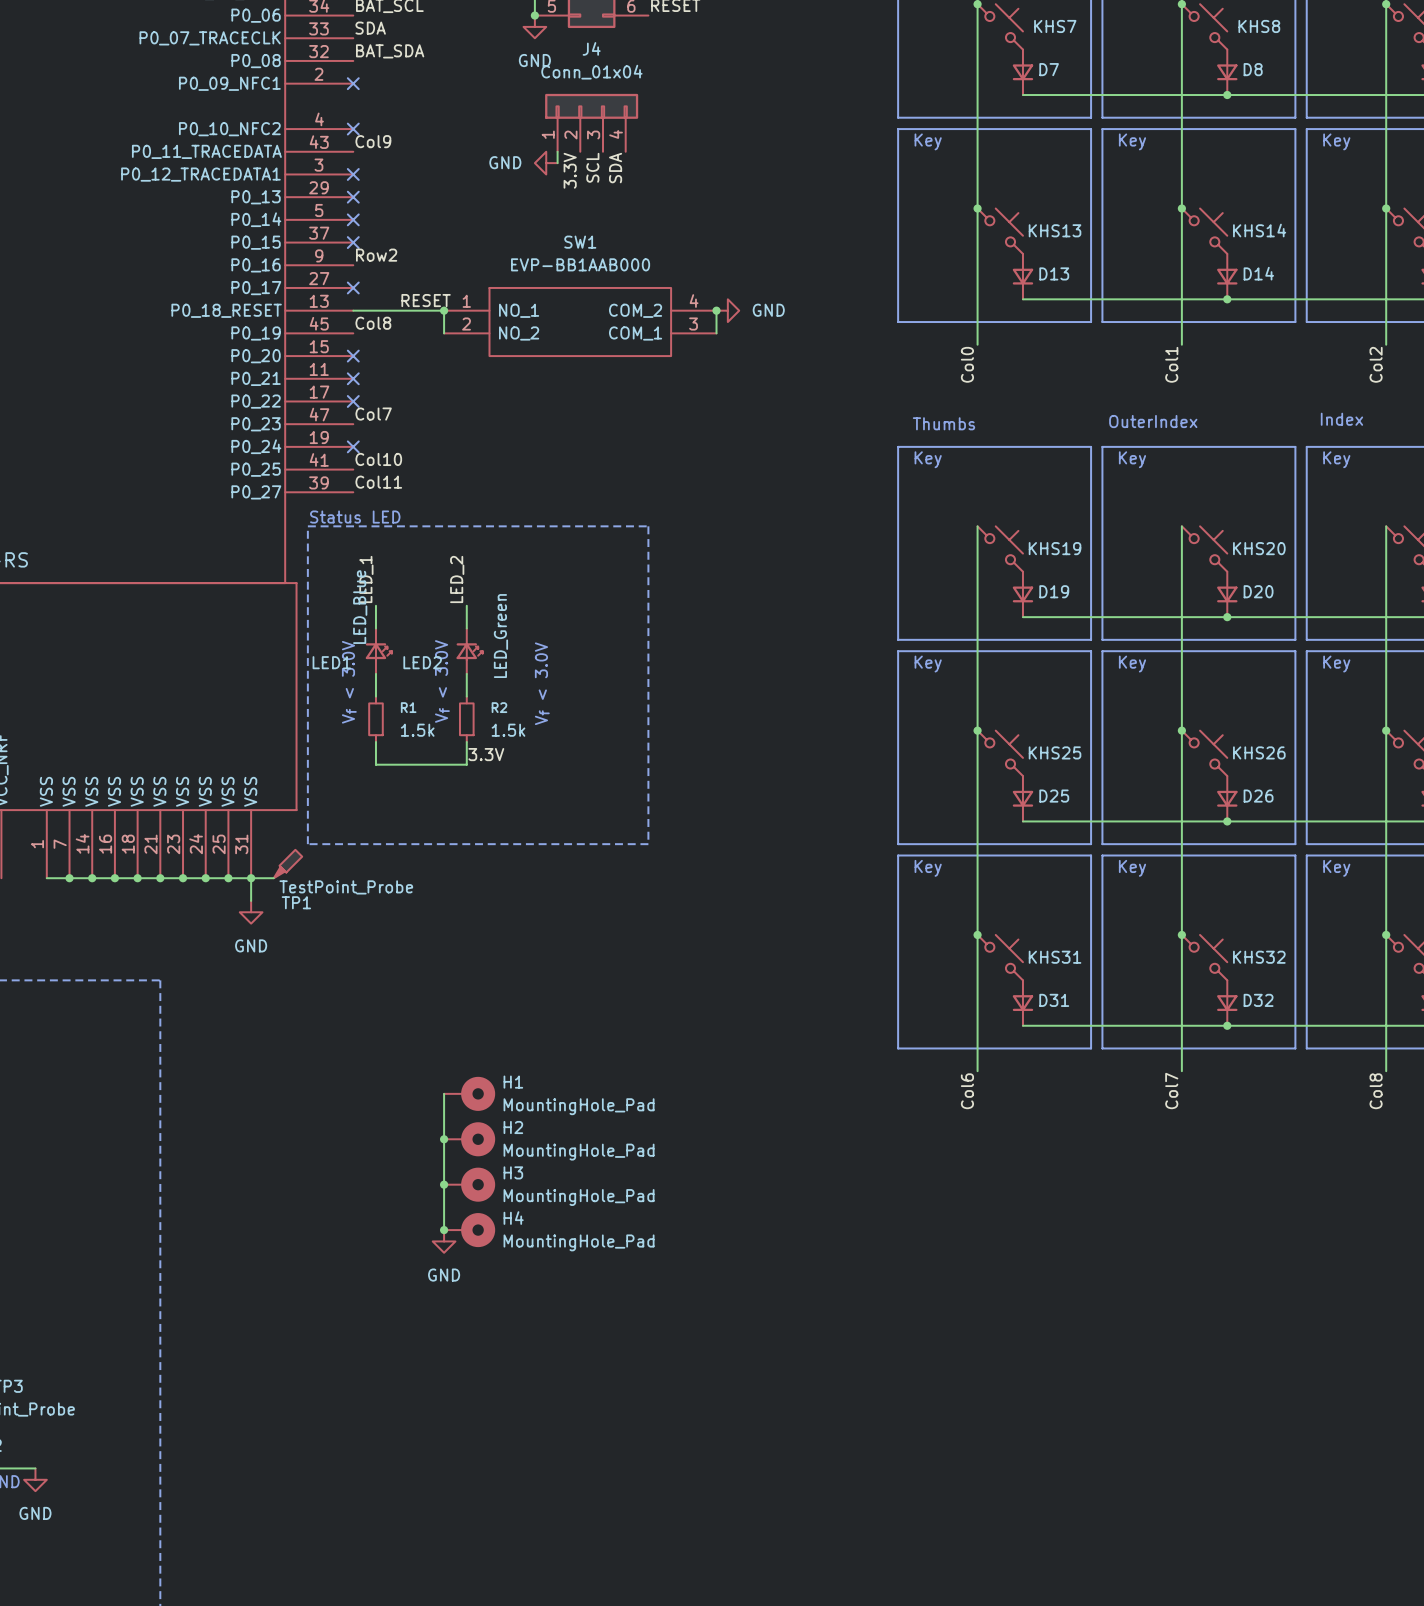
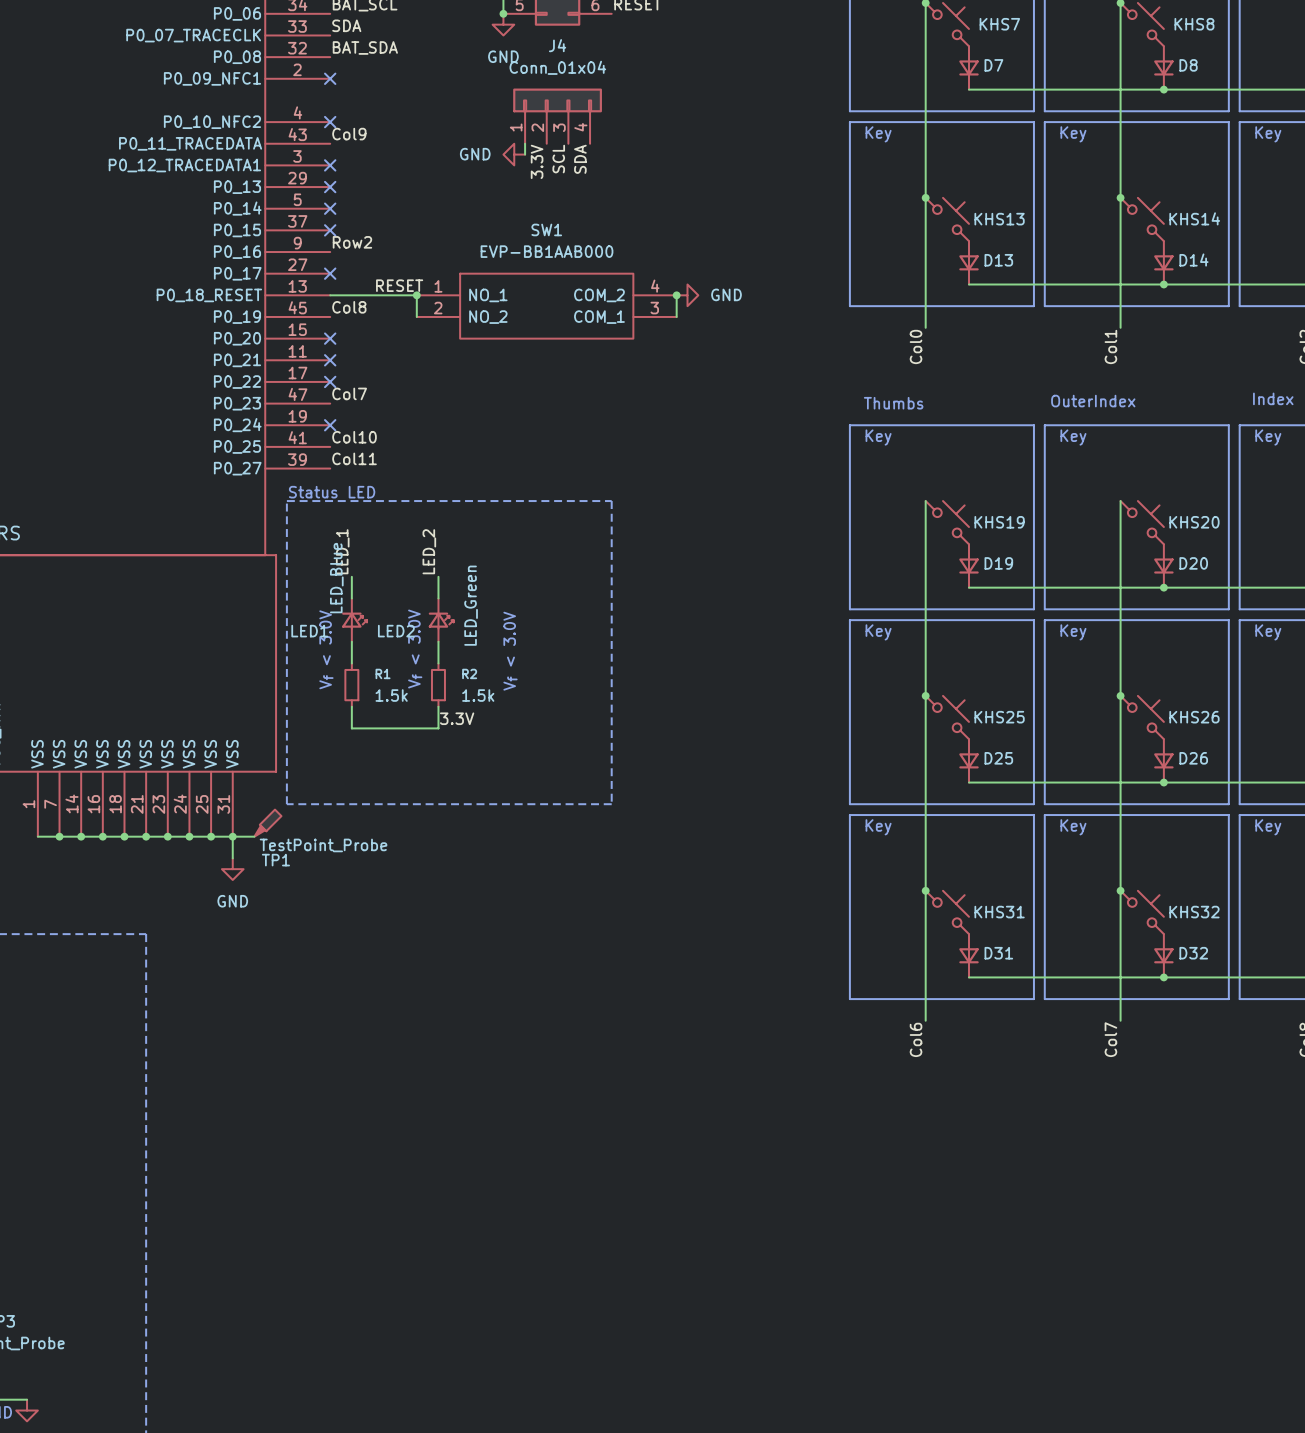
wire: (444, 1093) (444, 1230) -> none
H1: MountingHole_Pad (469, 1093) -> none
junction: (444, 1139) -> none
H2: MountingHole_Pad (469, 1139) -> none
junction: (444, 1184) -> none
H3: MountingHole_Pad (469, 1184) -> none
junction: (444, 1230) -> none
H4: MountingHole_Pad (469, 1230) -> none
power symbol: GND (444, 1241) -> none

